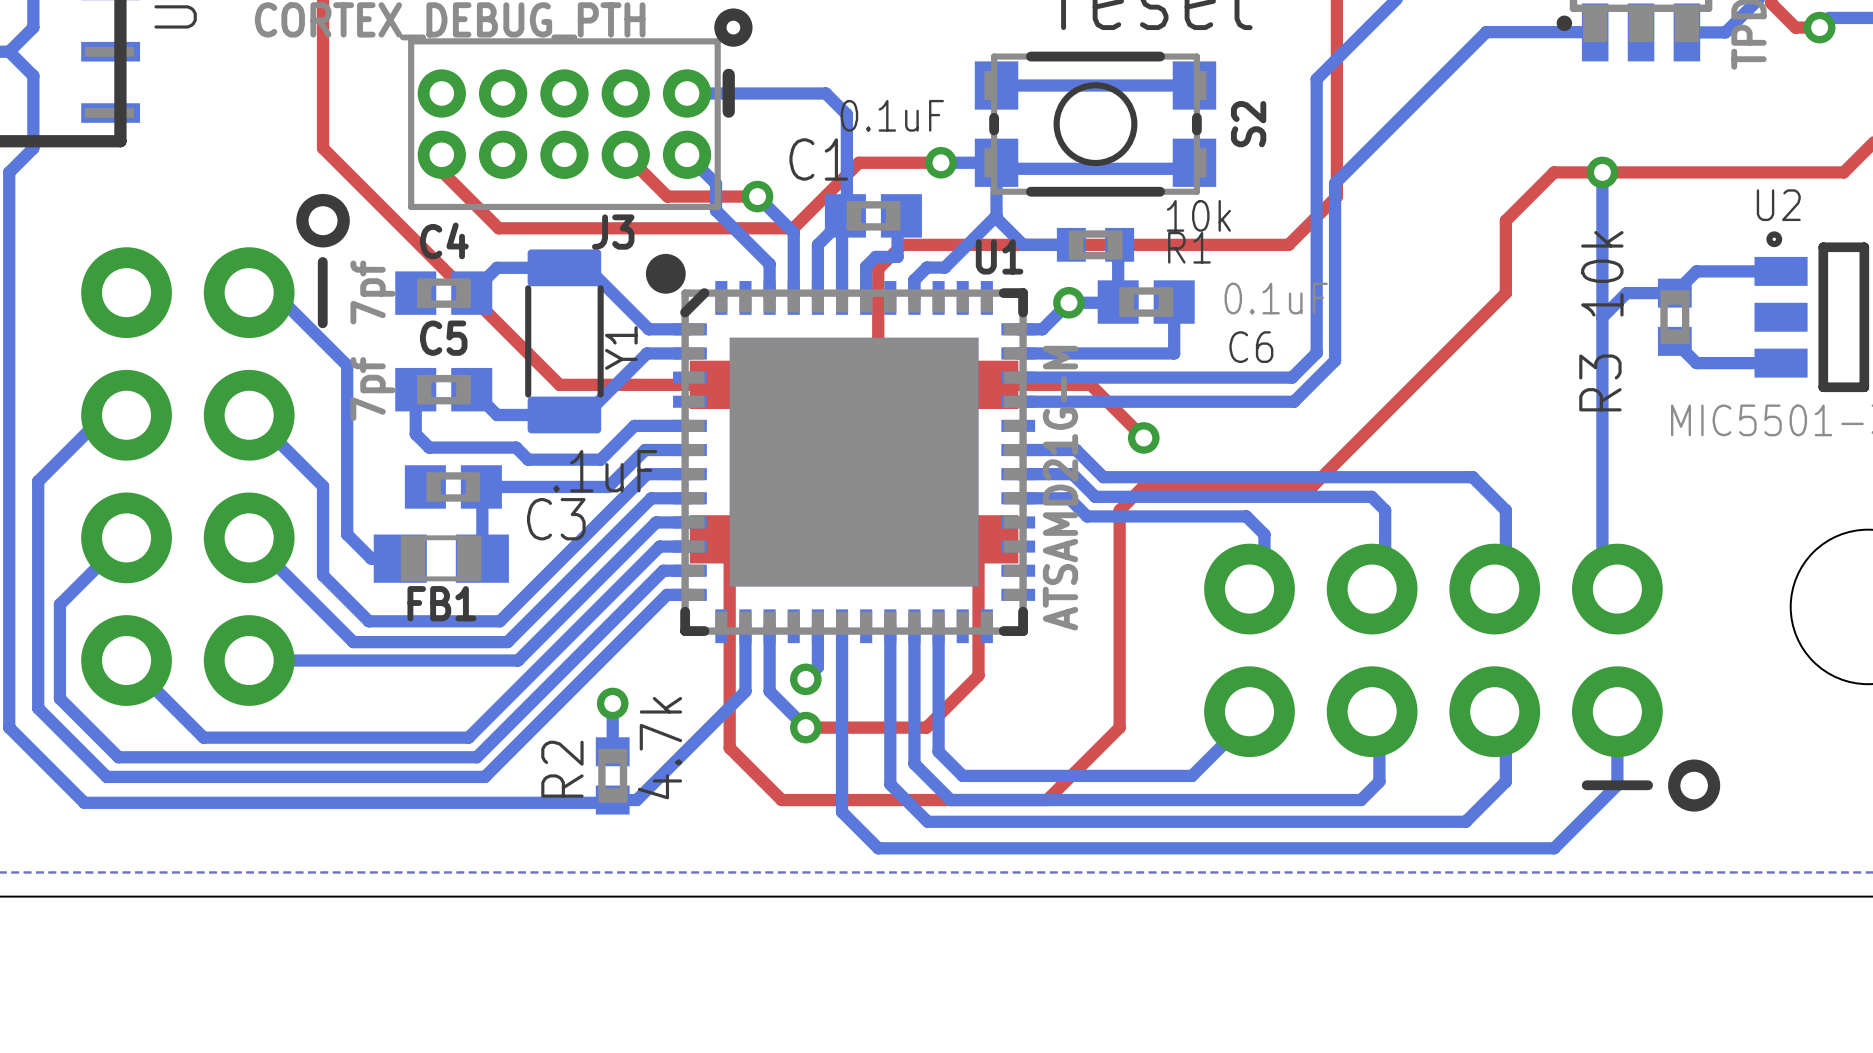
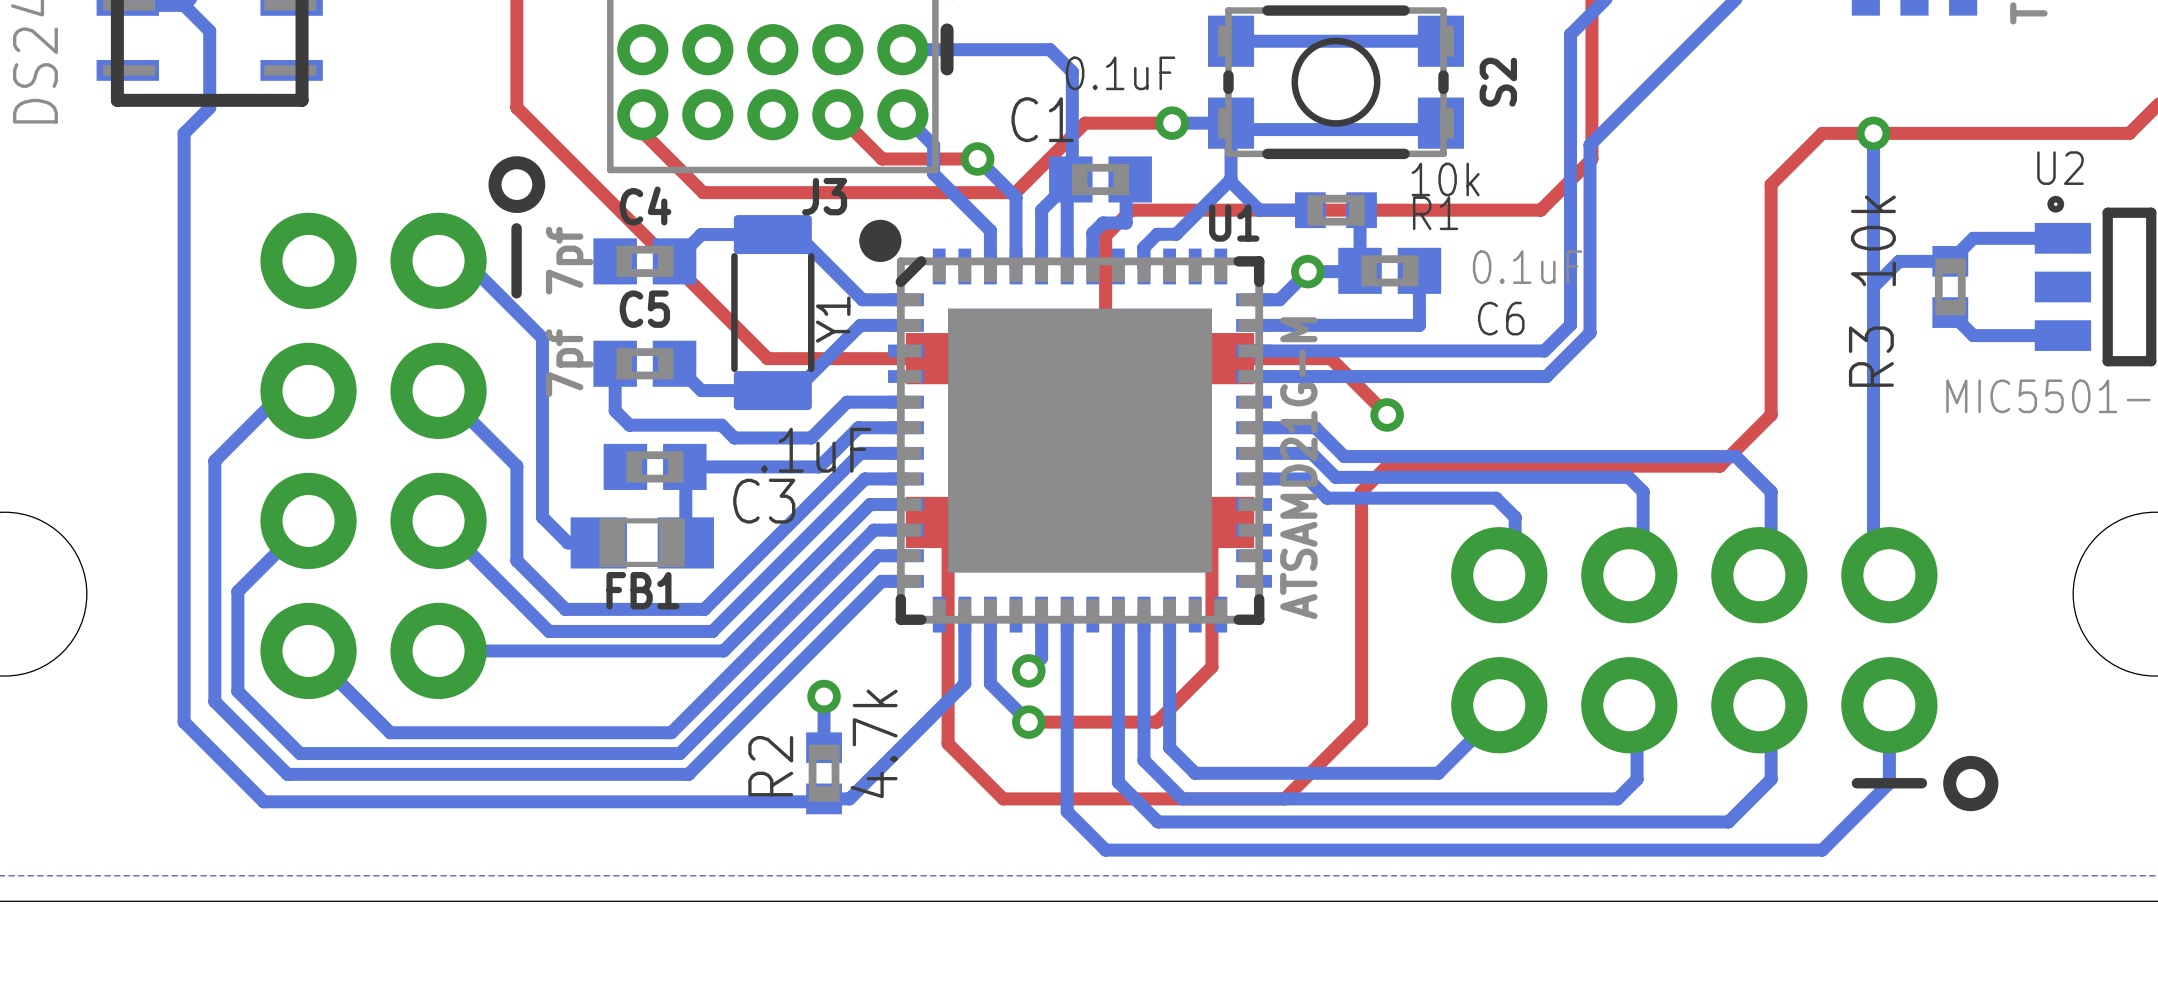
top track: (1505, 293) (1312, 486) -> (1771, 261) (1771, 414) (1719, 466) (1566, 466)

